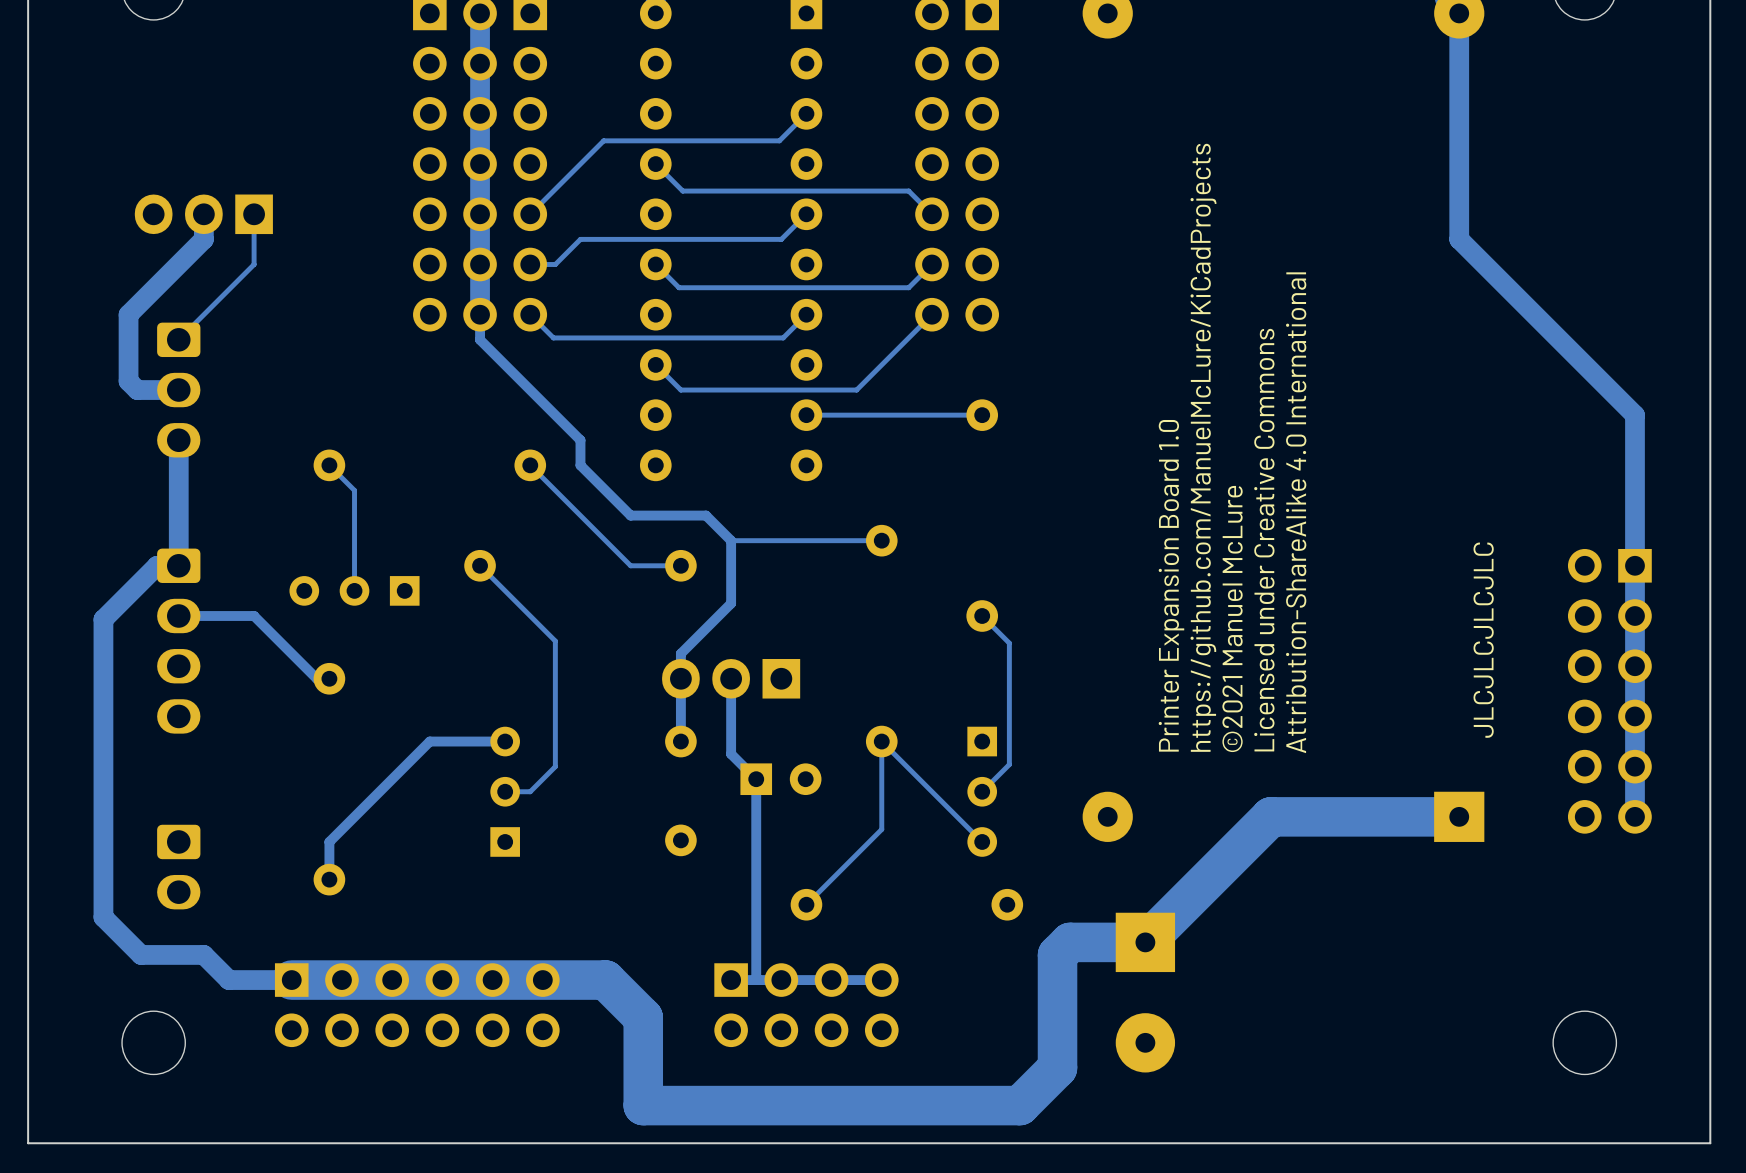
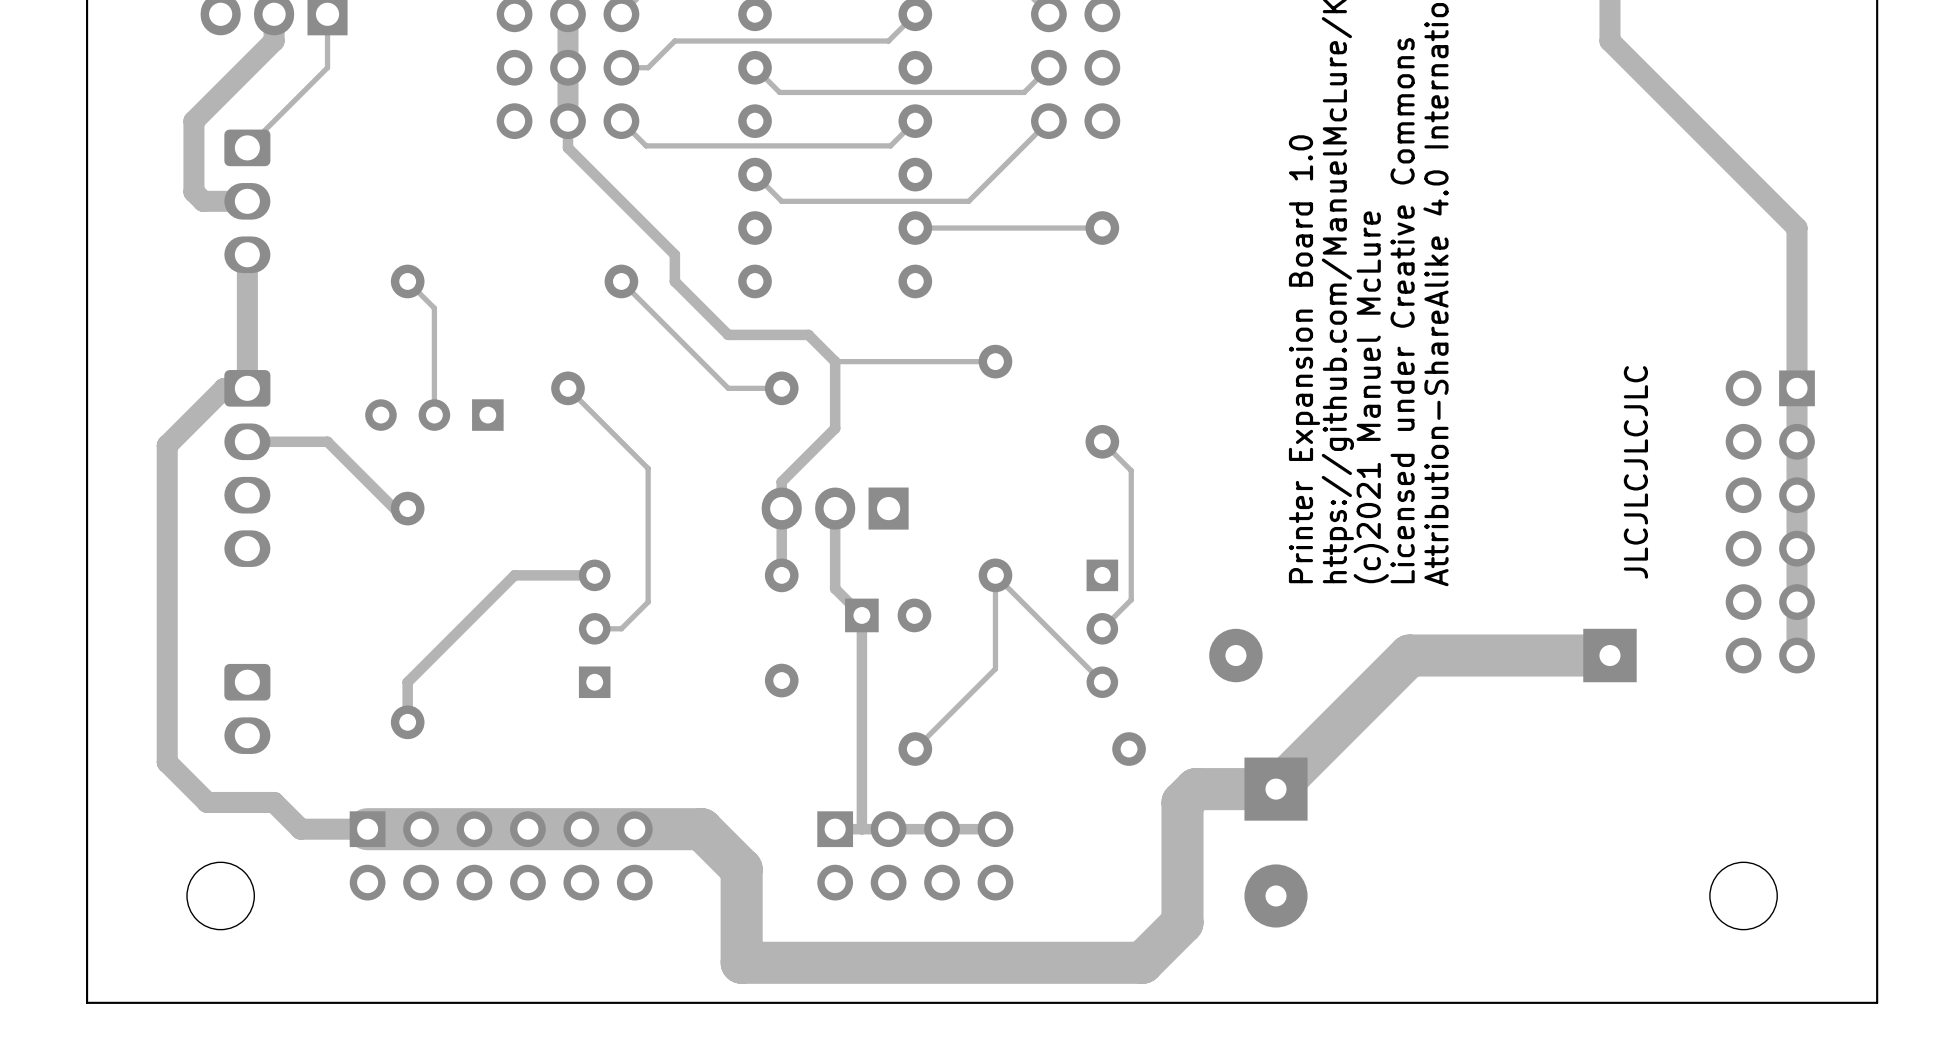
text: ©2021 Manuel McLure (1232, 618) -> (c)2021 Manuel McLure (1371, 397)

